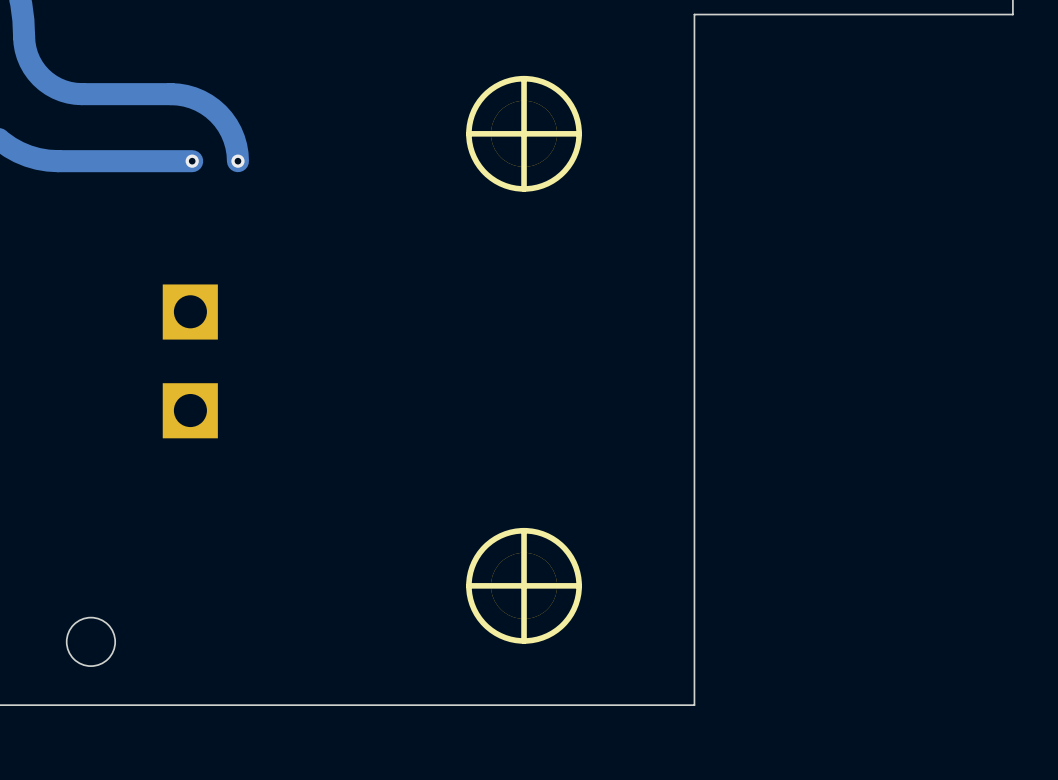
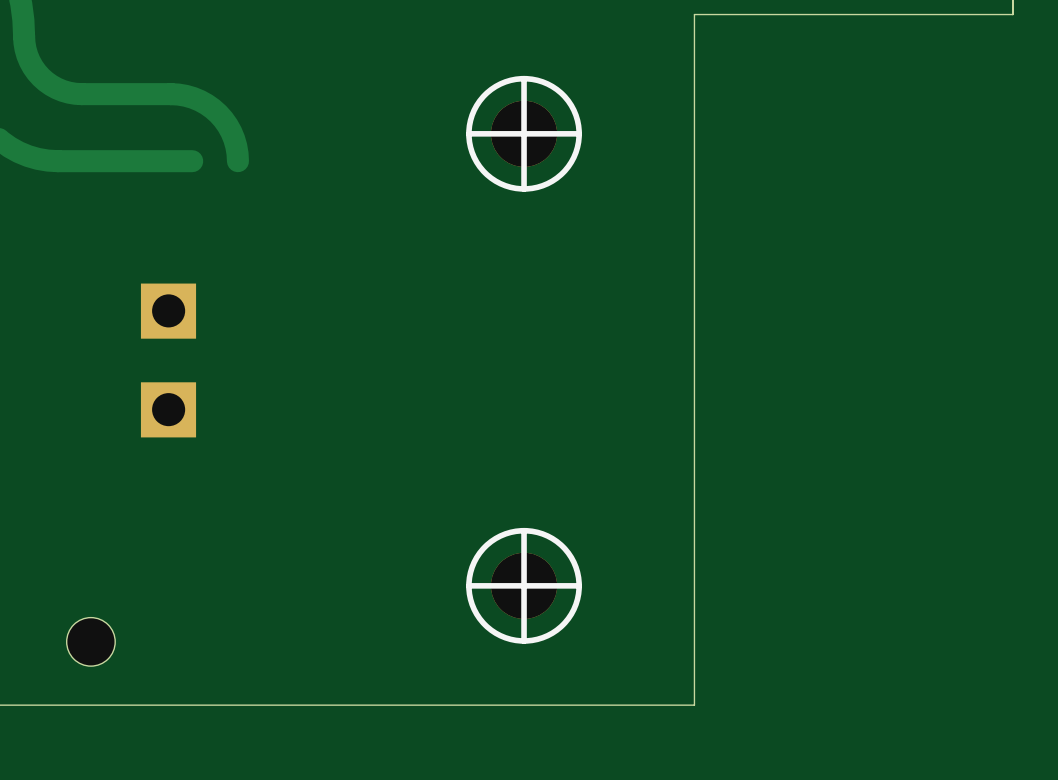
via: (192, 161) -> none
via: (237, 161) -> none
part position: (190, 361) -> (168, 360)

